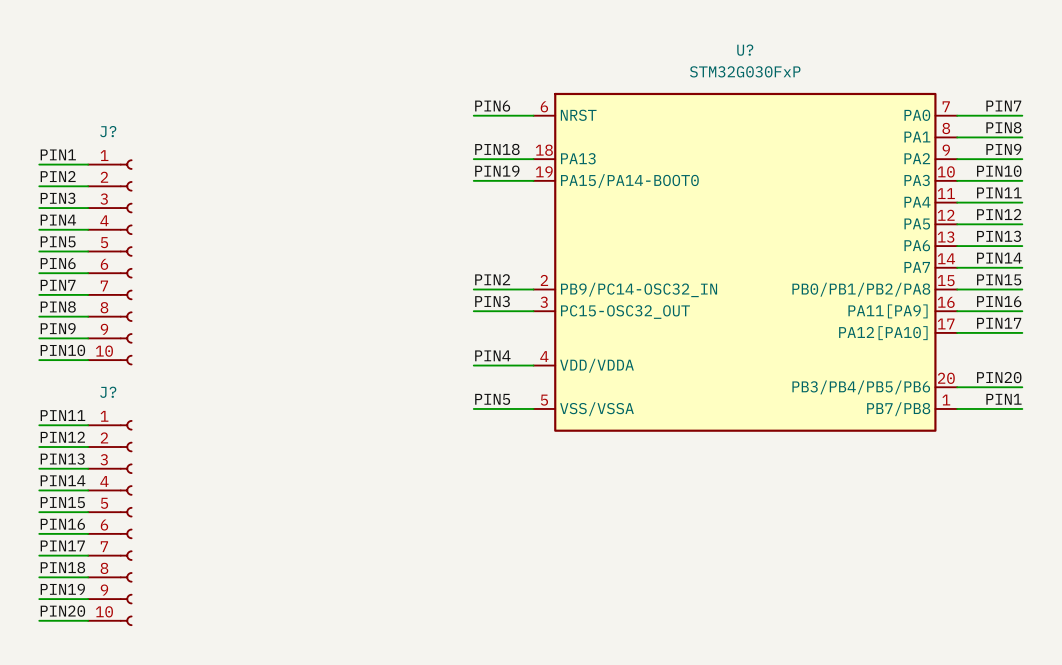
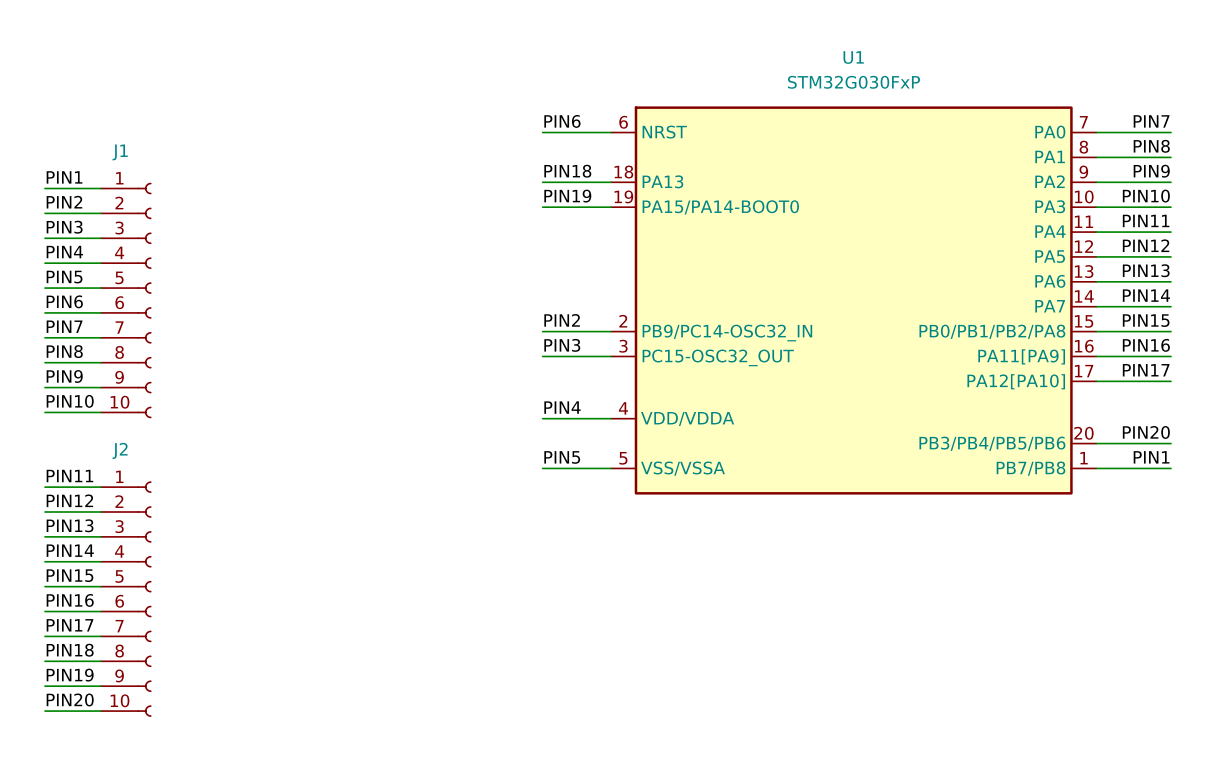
U? name: U? (745, 50) -> U1 (853, 57)
J? name: J? (108, 131) -> J1 (120, 152)
J? name: J? (108, 392) -> J2 (120, 450)

